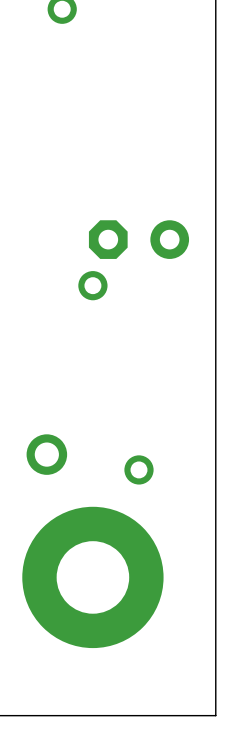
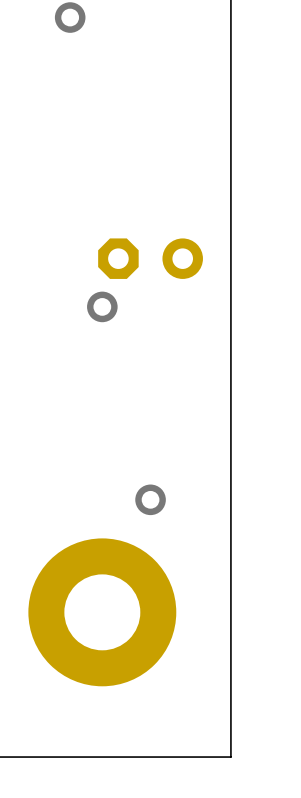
part: (46, 454) -> none

